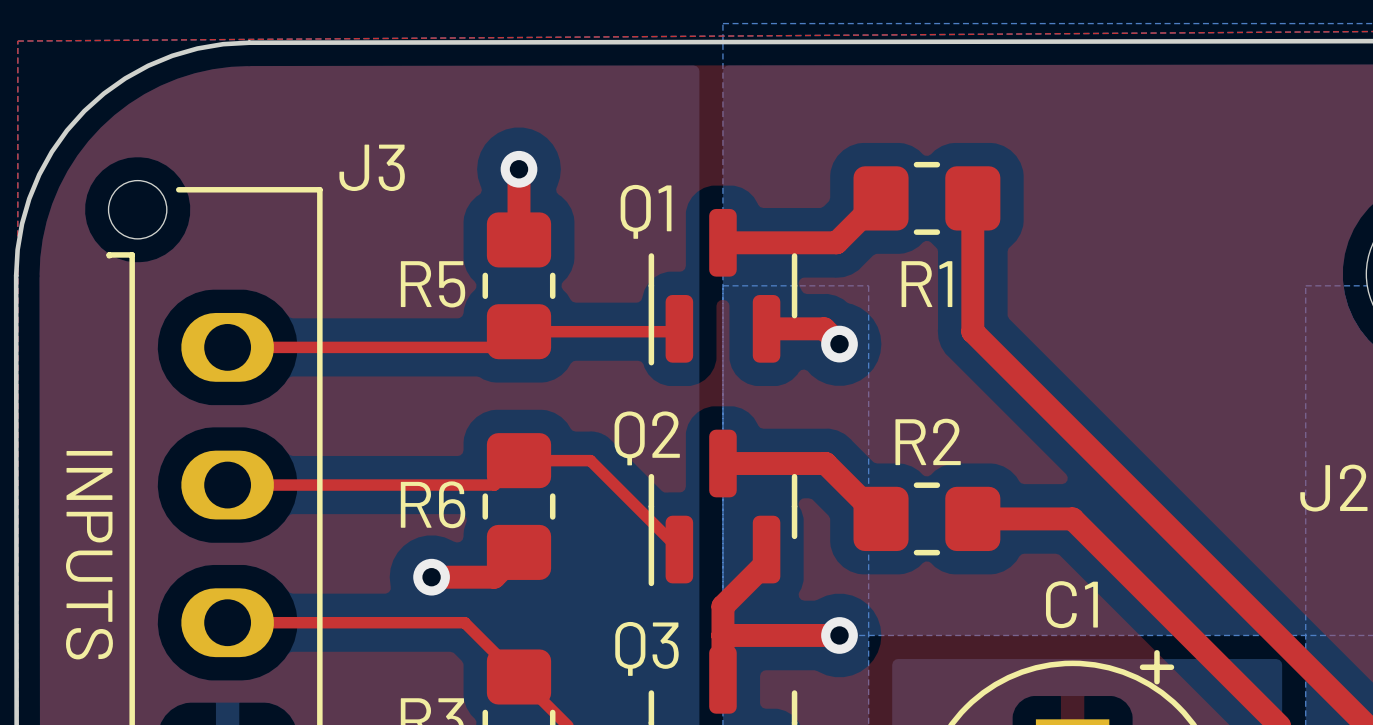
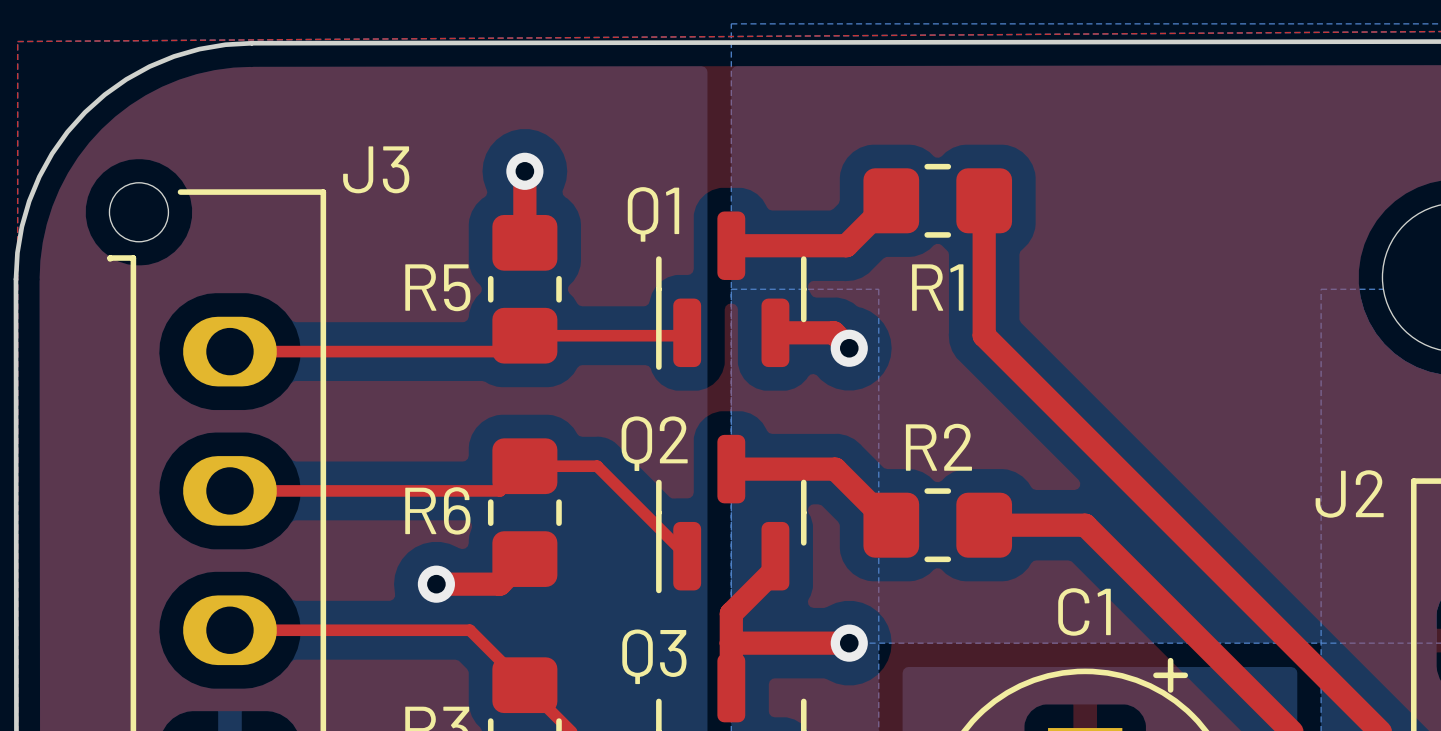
text: INPUTS (89, 555) -> none

